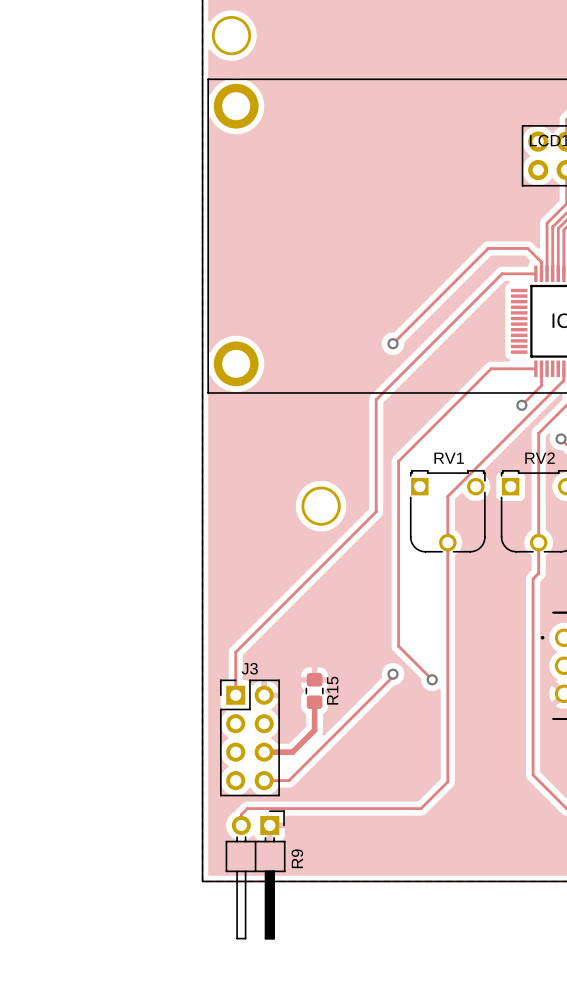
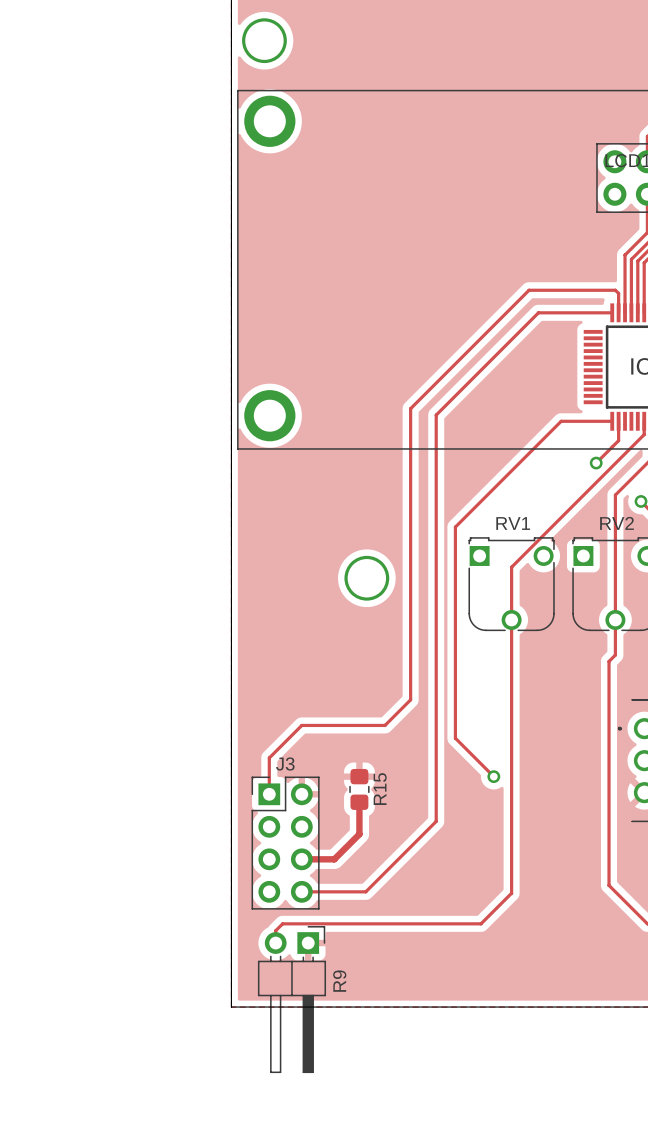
track: (541, 262) (527, 248) (488, 248) (393, 343) -> none
track: (502, 273) (376, 399) (376, 511) (235, 652) (235, 663) -> (618, 299) (618, 293) (615, 290) (529, 290) (410, 408) (410, 699) (385, 725) (301, 725) (269, 757)
via: (393, 343) -> none
track: (393, 674) (393, 676) (289, 780) -> (573, 312) (538, 312) (436, 415) (436, 821) (365, 891) (330, 891)
via: (393, 674) -> none

